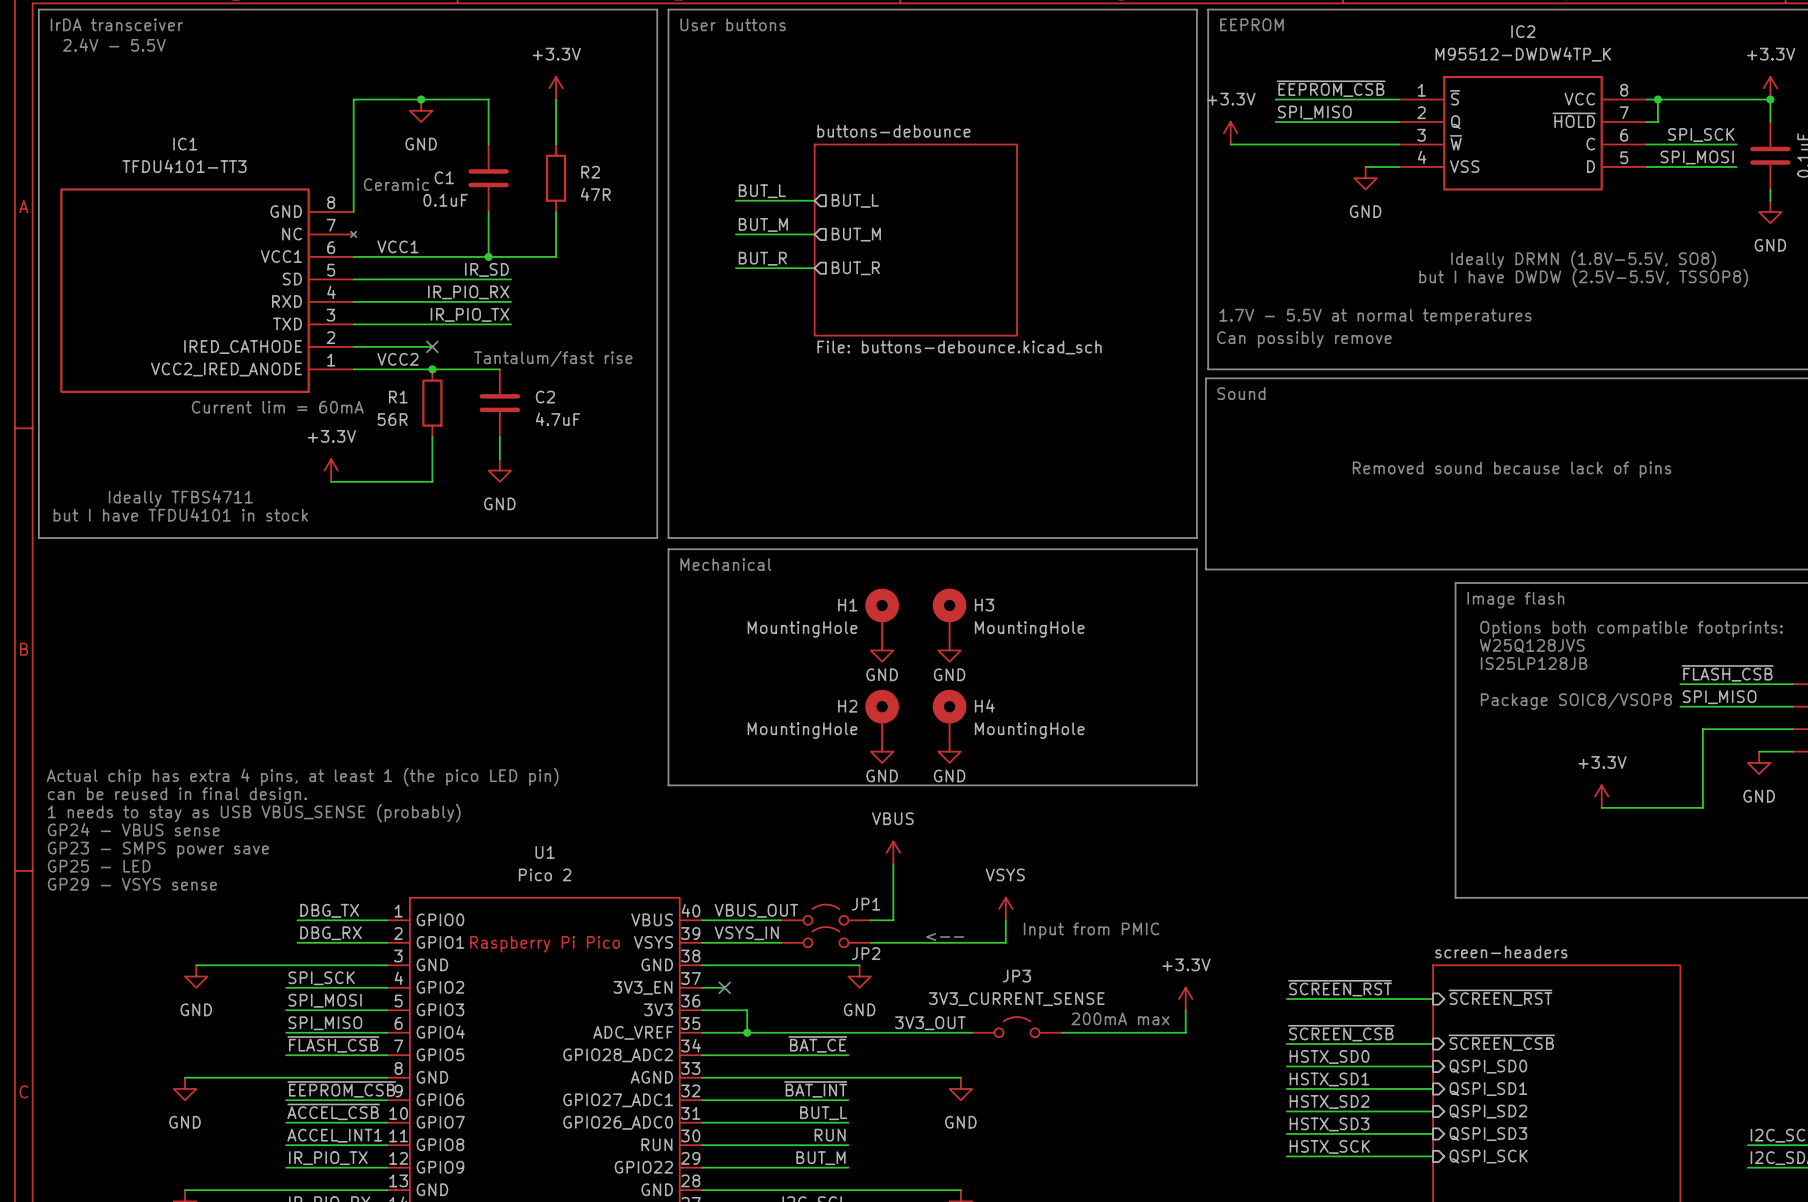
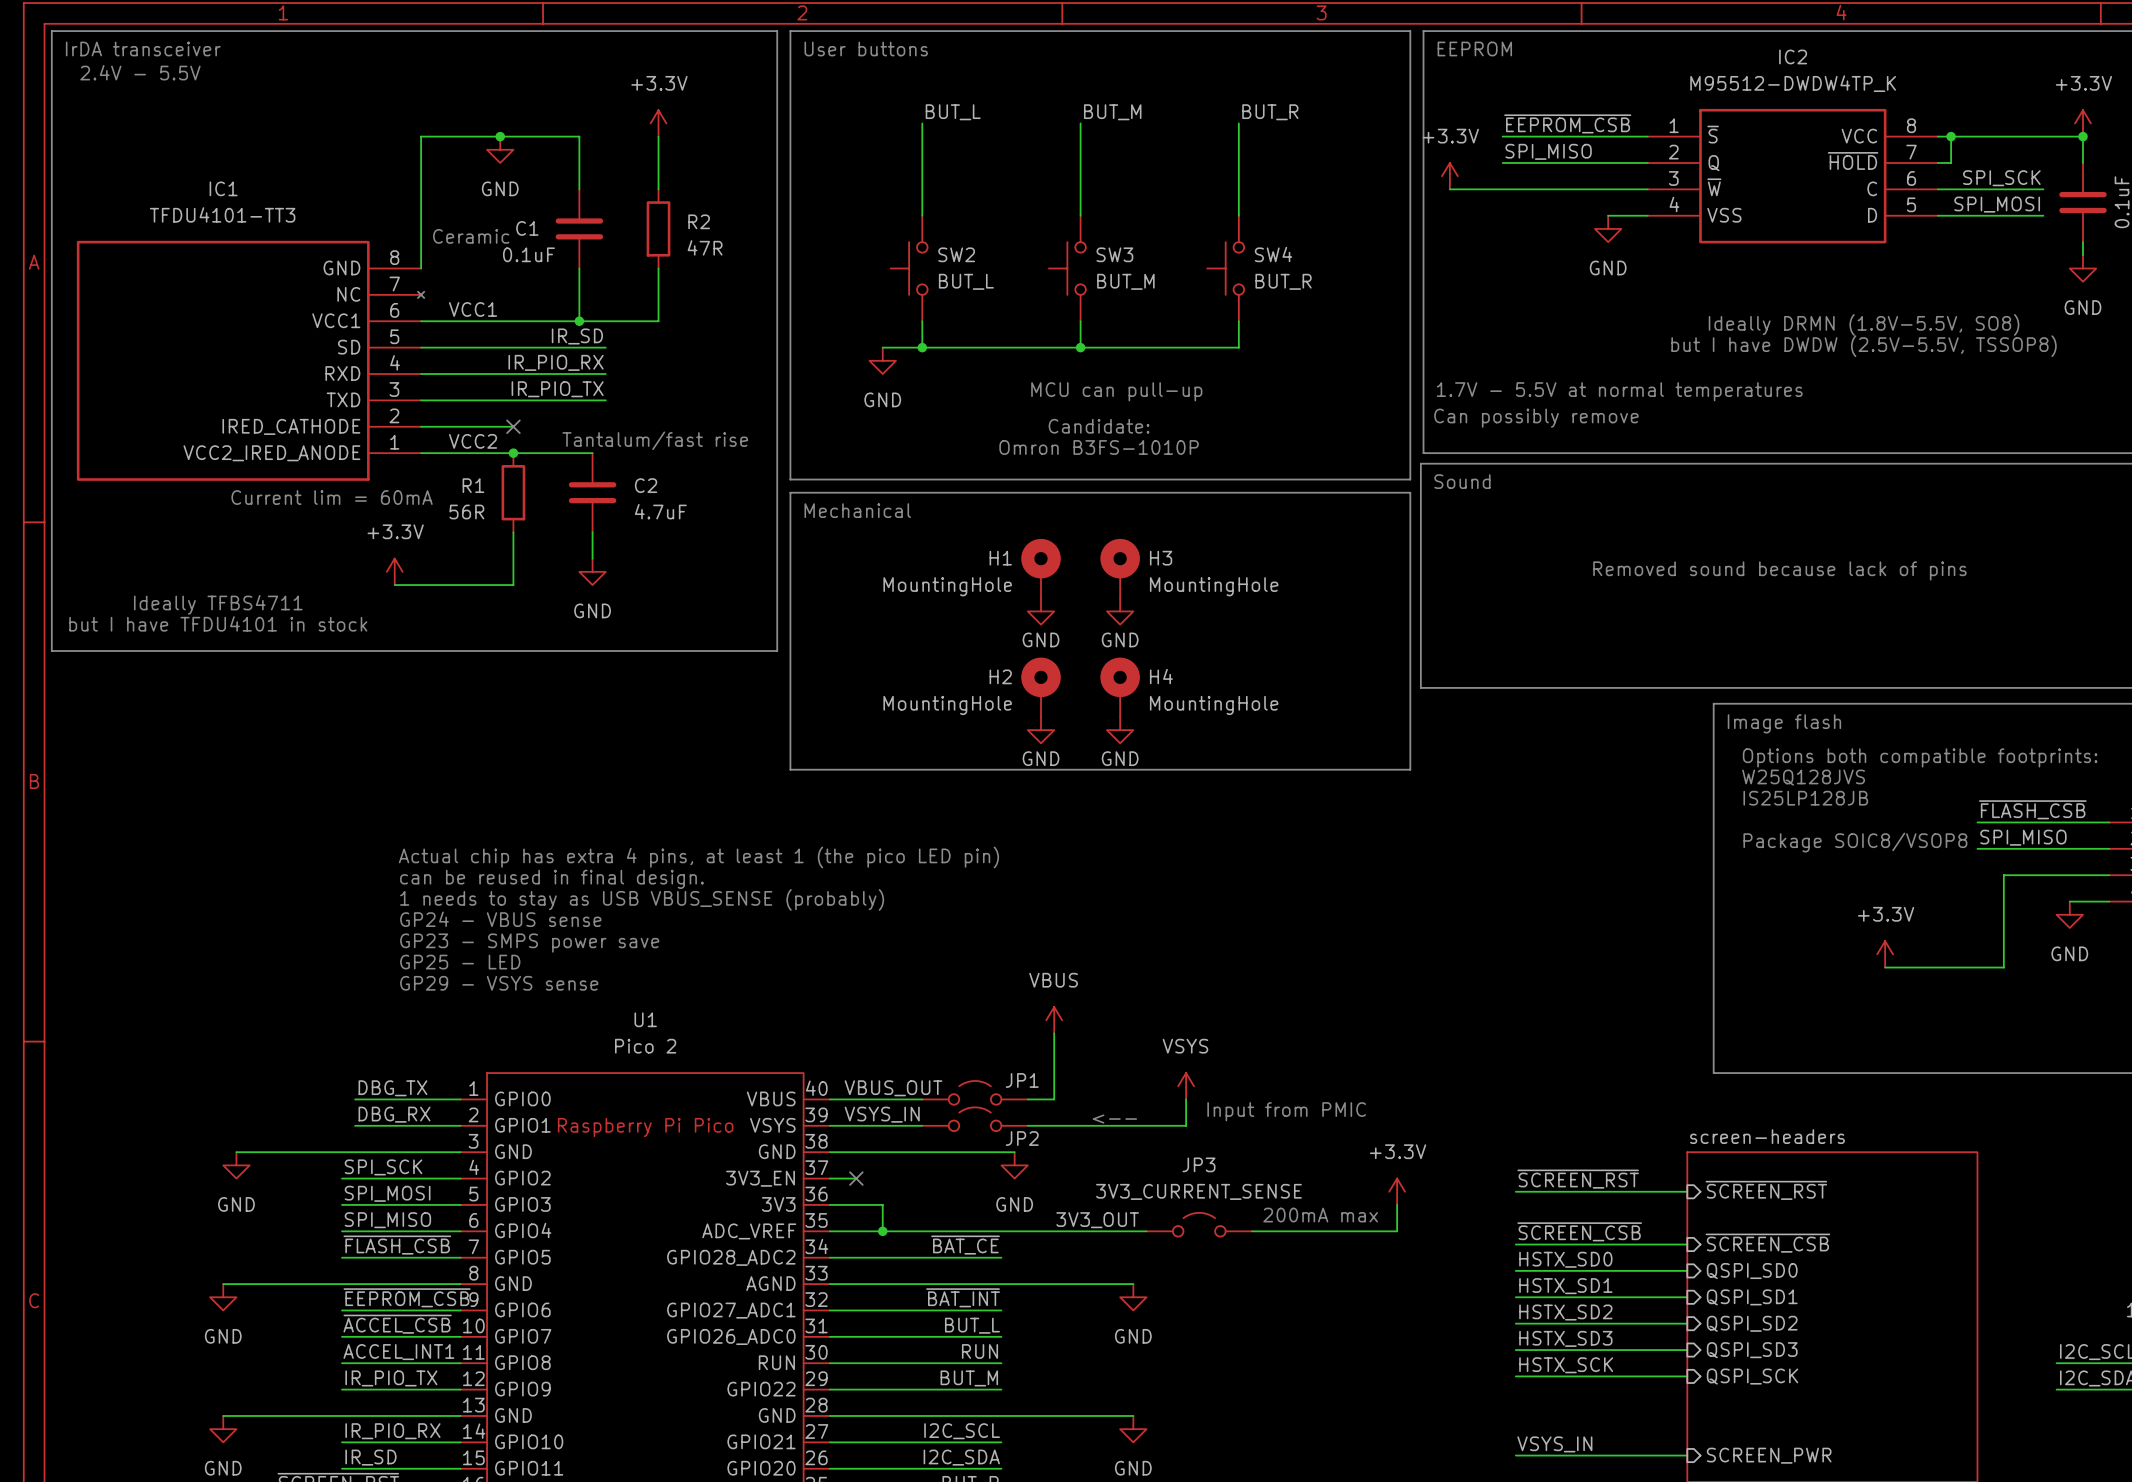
label: none -> BUT_M (1112, 112)
label: none -> BUT_R (1270, 112)
wire: none -> (922, 123) (922, 215)
wire: none -> (1080, 123) (1080, 215)
wire: none -> (1238, 123) (1238, 215)
label position: BUT_L (762, 191) -> BUT_L (953, 112)
wire: (735, 200) (814, 200) -> none
sheet pin: BUT_L (855, 200) -> none
SW2: none -> BUT_L (909, 268)
SW3: none -> BUT_M (1067, 268)
SW4: none -> BUT_R (1225, 268)
label: BUT_M (763, 224) -> none
wire: (735, 234) (814, 234) -> none
sheet pin: BUT_M (856, 234) -> none
sheet buttons-debounce: File: buttons-debounce.kicad_sch (915, 240) -> none
wire: none -> (922, 321) (922, 347)
wire: none -> (1080, 321) (1080, 347)
wire: none -> (1238, 321) (1238, 347) (882, 347)
label: BUT_R (762, 258) -> none
wire: (735, 268) (814, 268) -> none
sheet pin: BUT_R (855, 268) -> none
junction: none -> (922, 347)
junction: none -> (1080, 347)
power symbol: none -> GND (882, 360)
text: none -> MCU can pull-up (1116, 391)
text: none -> Candidate: (1099, 426)
text: none -> Omron B3FS-1010P (1099, 447)
line: (668, 391) (668, 403) -> (790, 479) (1410, 479)
line: (1196, 391) (1196, 403) -> (790, 492) (1410, 492)
power symbol: none -> GND (1041, 611)
power symbol: none -> GND (1120, 611)
line: (668, 538) (1196, 538) -> (790, 650) (790, 664)
line: (668, 549) (1196, 549) -> (1410, 650) (1410, 664)
text position: Mechanical (725, 564) -> Mechanical (857, 510)
power symbol: none -> GND (1041, 730)
power symbol: none -> GND (1120, 730)
H1 position: (882, 613) -> (1041, 568)
H3 position: (949, 613) -> (1120, 568)
line: (668, 639) (668, 785) (1196, 785) (1196, 639) -> (790, 769) (1410, 769)
power symbol: GND (882, 650) -> none
power symbol: GND (949, 650) -> none
text: none -> Actual chip has extra 4 pins, at least 1 (the pico LED pin) (698, 857)
H2 position: (882, 715) -> (1041, 687)
H4 position: (949, 715) -> (1120, 687)
text: none -> can be reused in final design. (551, 879)
text: none -> 1 needs to stay as USB VBUS_SENSE (probably) (642, 899)
power symbol: GND (882, 751) -> none
power symbol: GND (949, 751) -> none
text: none -> GP24 - VBUS sense (500, 919)
text: Actual chip has extra 4 pins, at least 1 (the pico LED pin) (302, 777) -> none
text: none -> GP23 - SMPS power save (529, 943)
text: can be reused in final design. (177, 795) -> none
text: none -> GP25 - LED (460, 962)
text: 1 needs to stay as USB VBUS_SENSE (probably) (254, 813) -> none
text: none -> GP29 - VSYS sense (499, 983)
text: GP24 - VBUS sense (133, 829) -> none
text: GP23 - SMPS power save (158, 849) -> none
text: GP25 - LED (99, 866) -> none
text: GP29 - VSYS sense (132, 884) -> none

